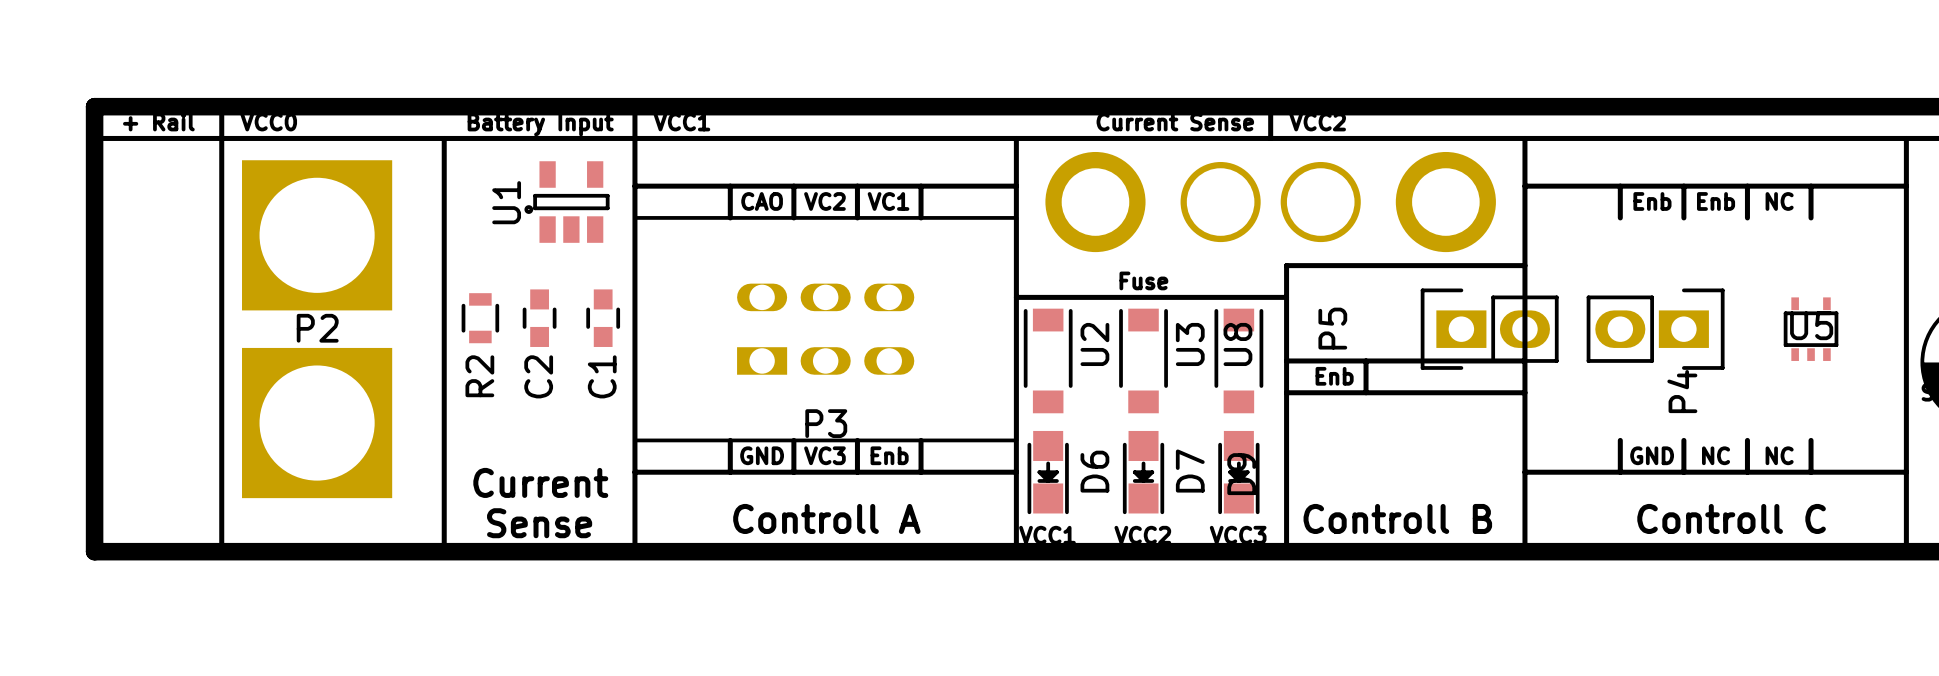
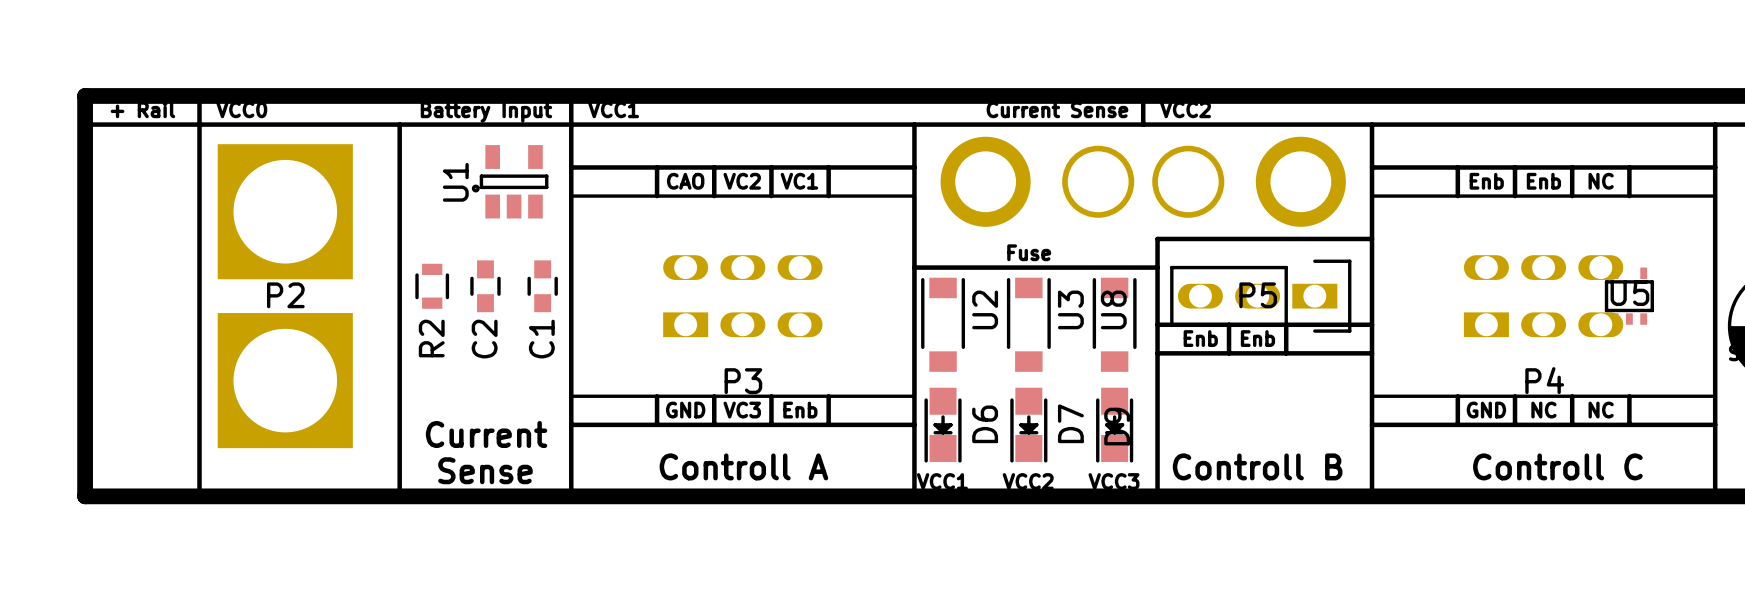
P5 footprint: [1420, 288, 1559, 370] -> [1170, 259, 1352, 333]
P4 footprint: [1586, 288, 1725, 370] -> [1370, 194, 1717, 398]
P5 name position: P5 (1332, 328) -> P5 (1258, 295)
line: none -> (1286, 324) (1286, 353)
text: none -> Enb (1257, 338)

